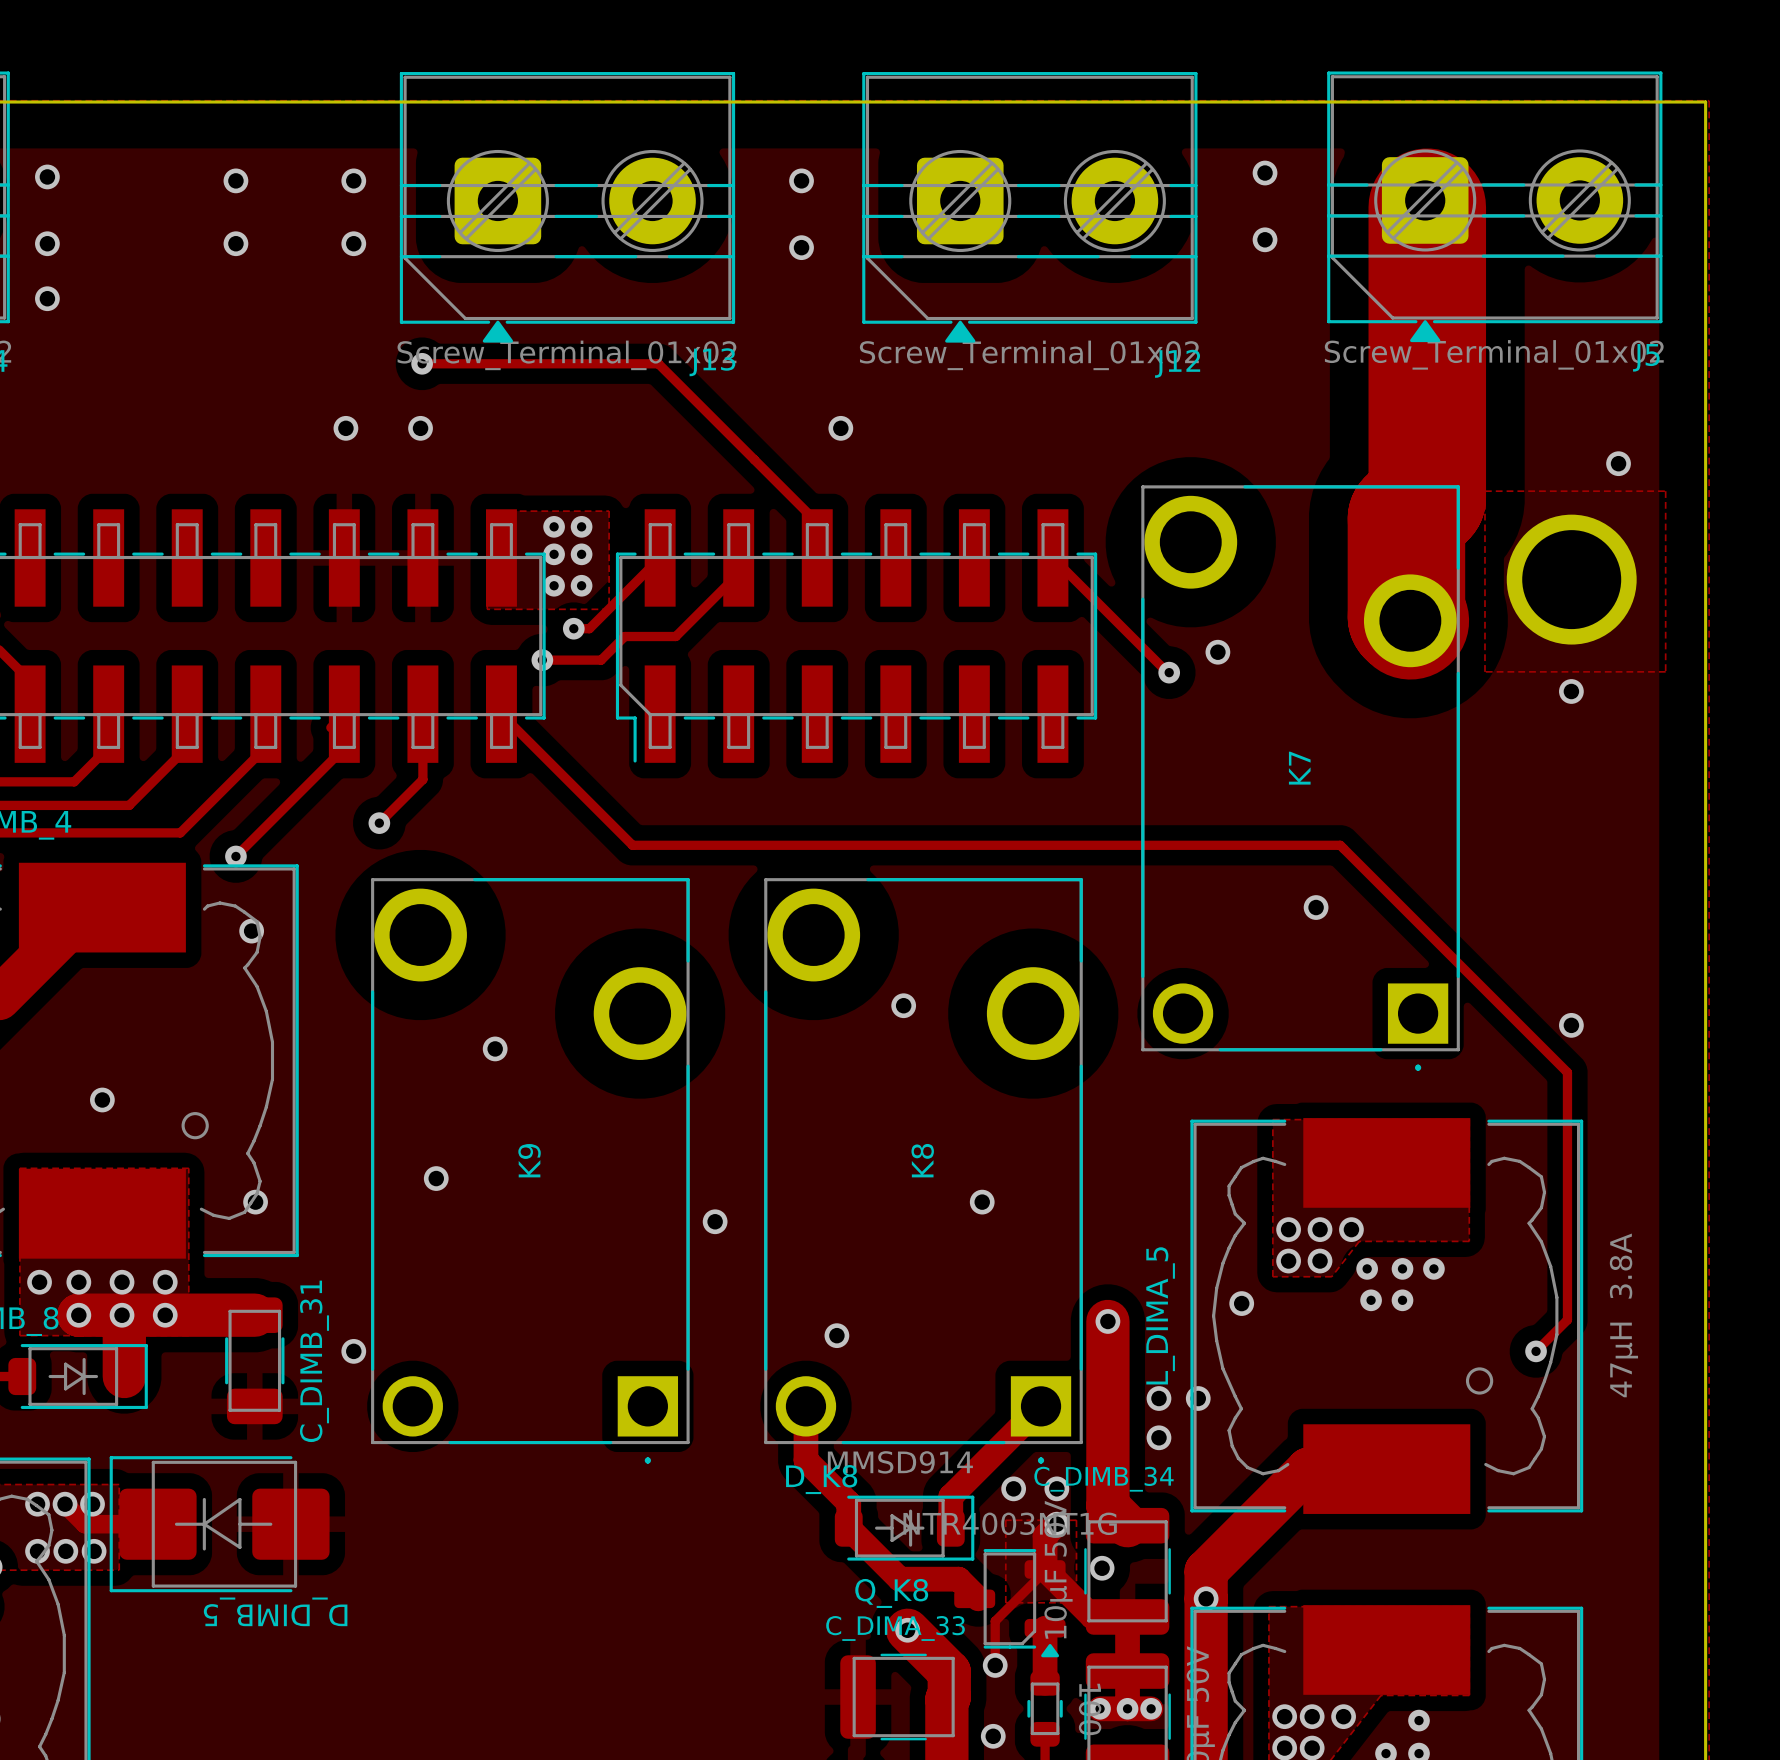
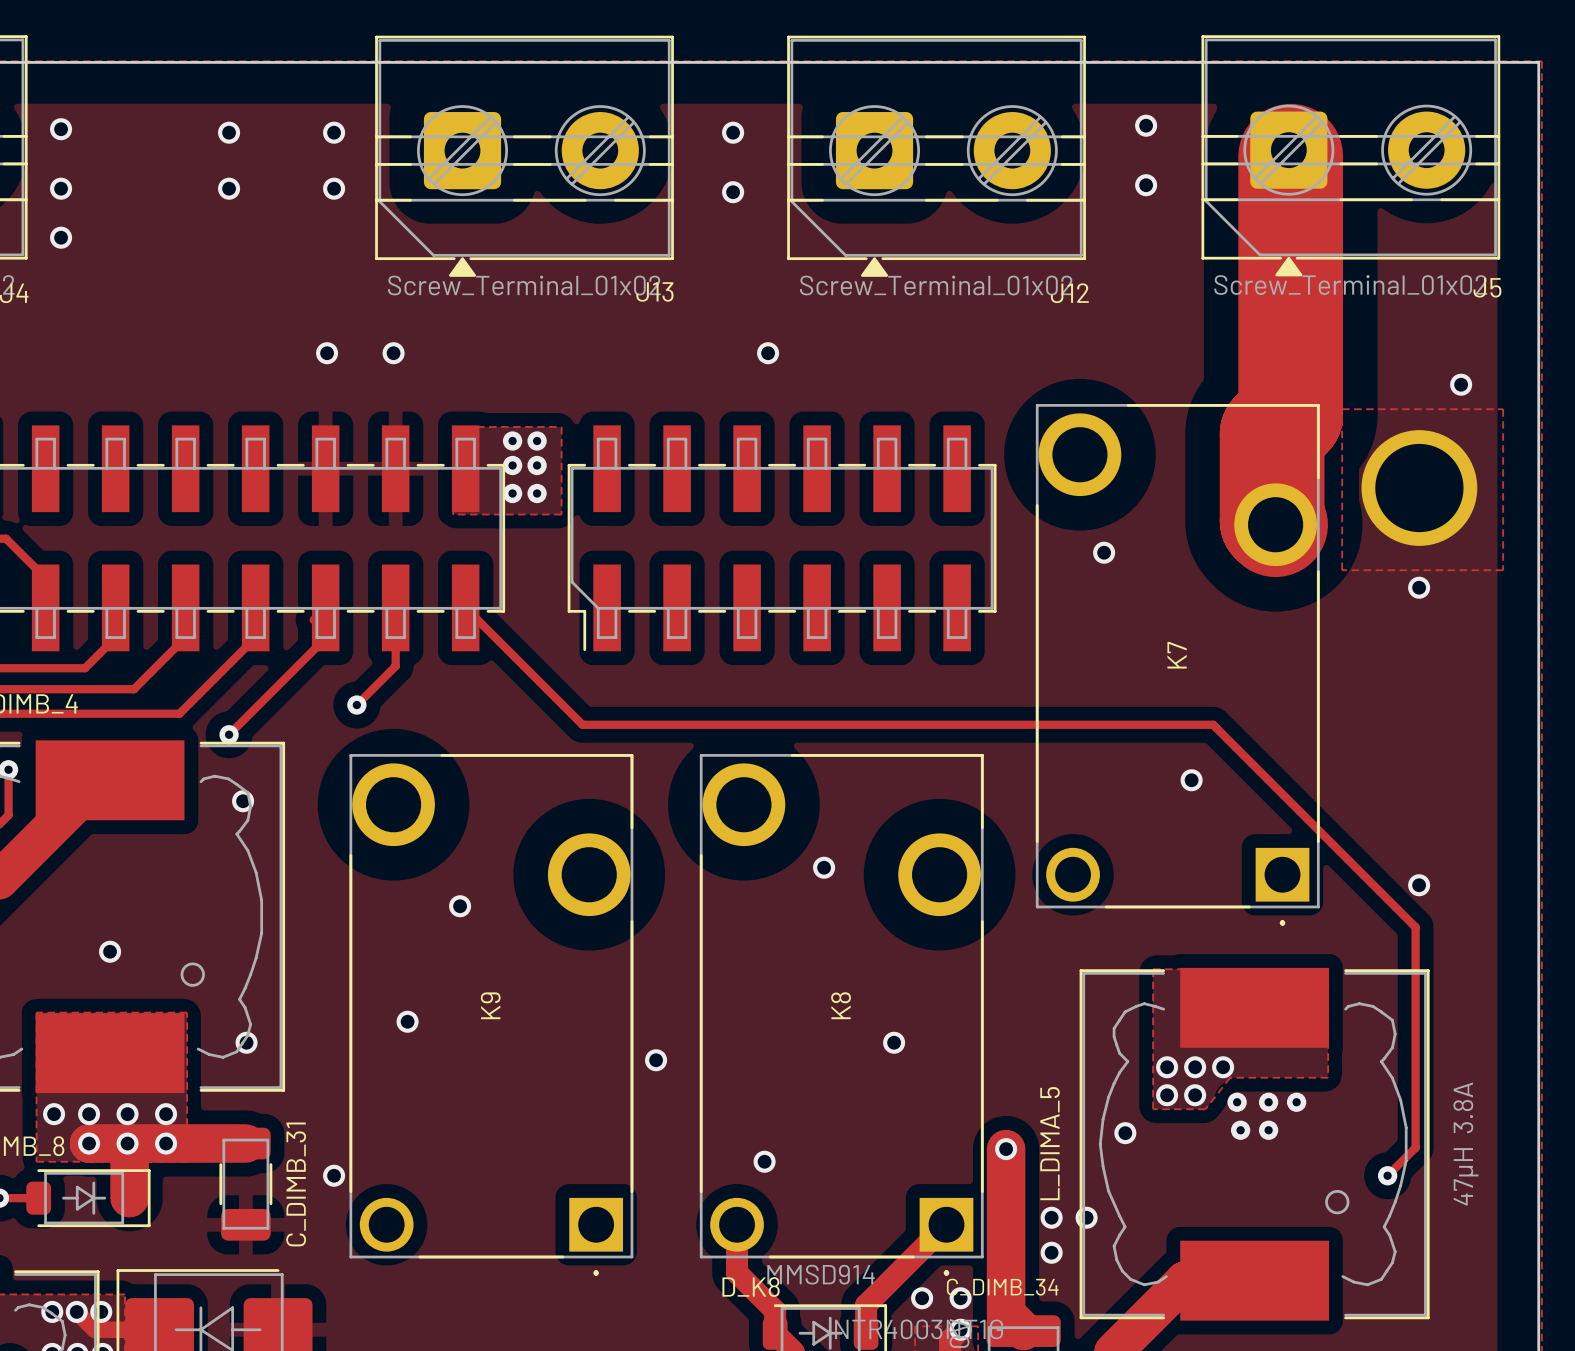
track: (422, 363) (658, 363) (817, 522) (817, 557) -> none
via: (422, 363) -> none
track: (660, 557) (589, 628) (573, 628) -> none
track: (738, 557) (738, 573) (675, 636) (624, 636) (601, 660) (542, 660) -> none
track: (1052, 557) (1169, 672) -> none
via: (573, 628) -> none
via: (542, 660) -> none
via: (1169, 672) -> none

